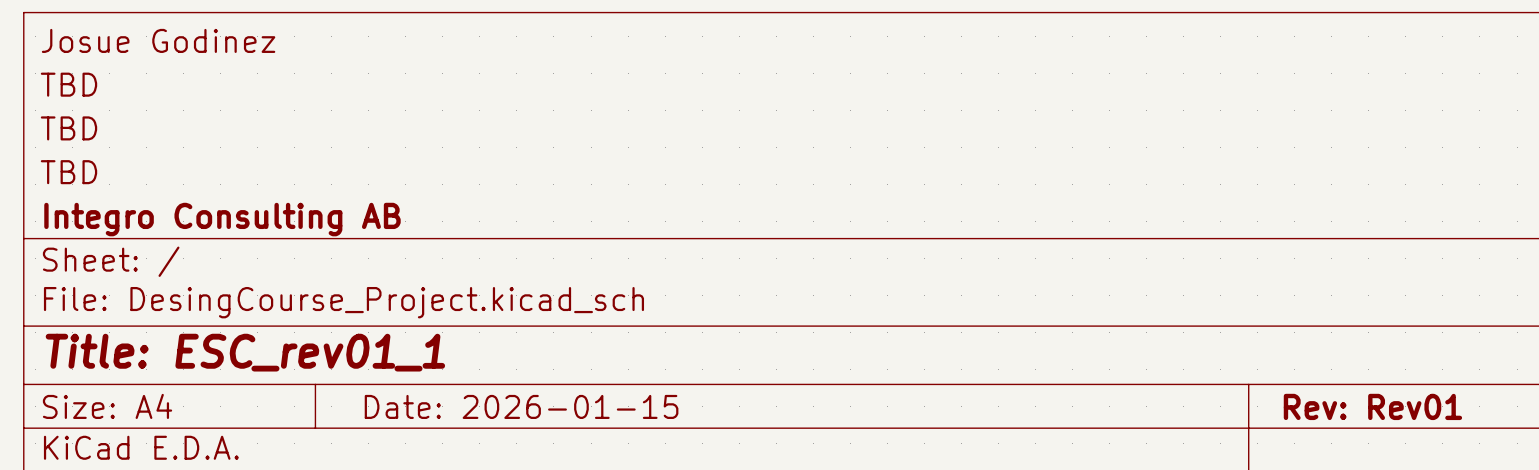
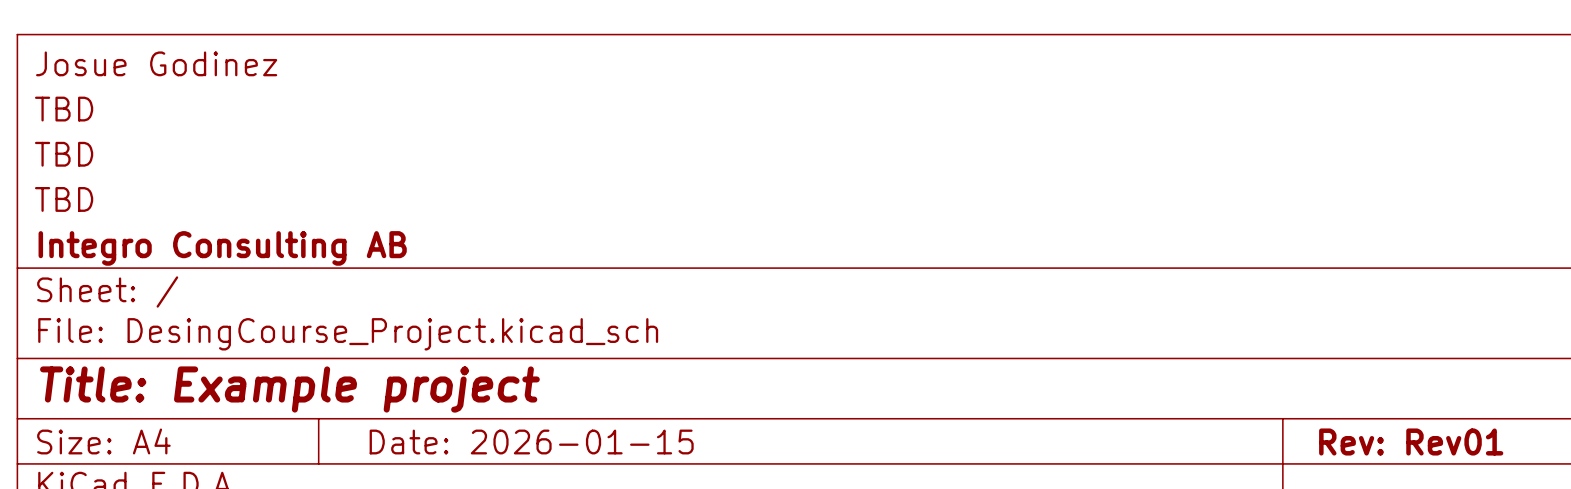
title block: Title: ESC_rev01_1 (245, 352) -> Title: Example project (289, 389)

